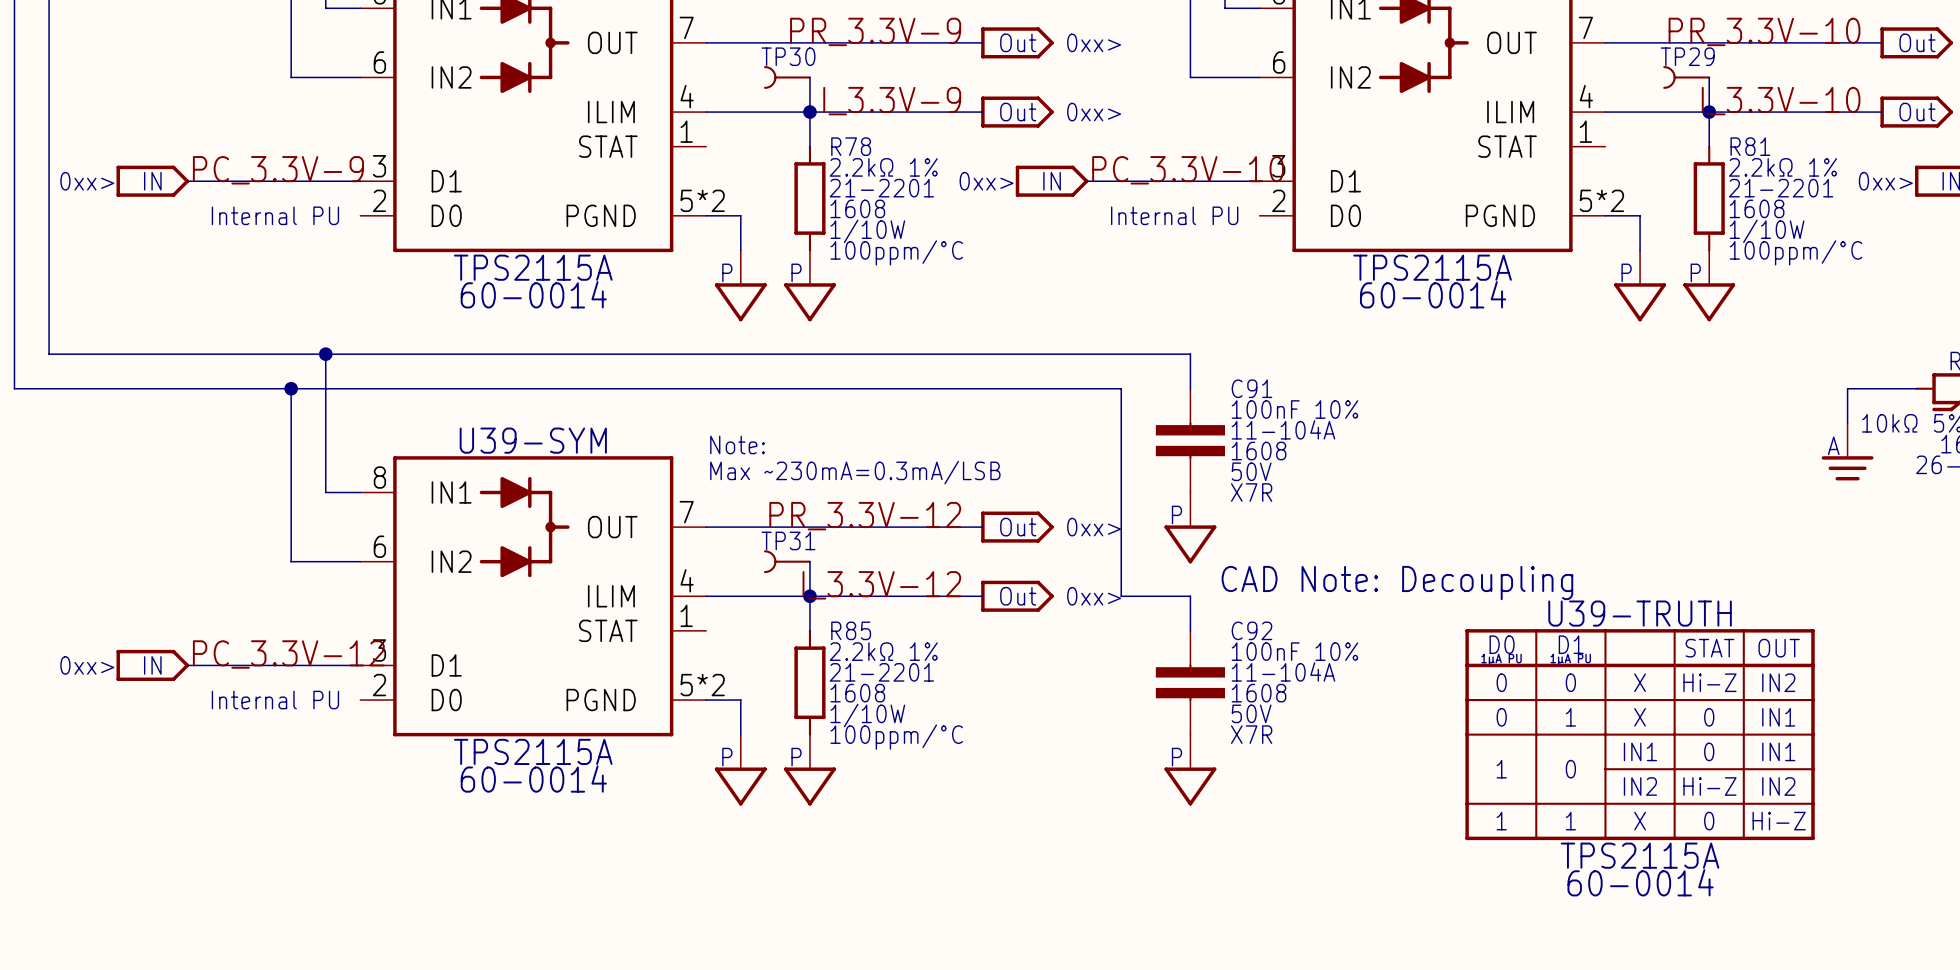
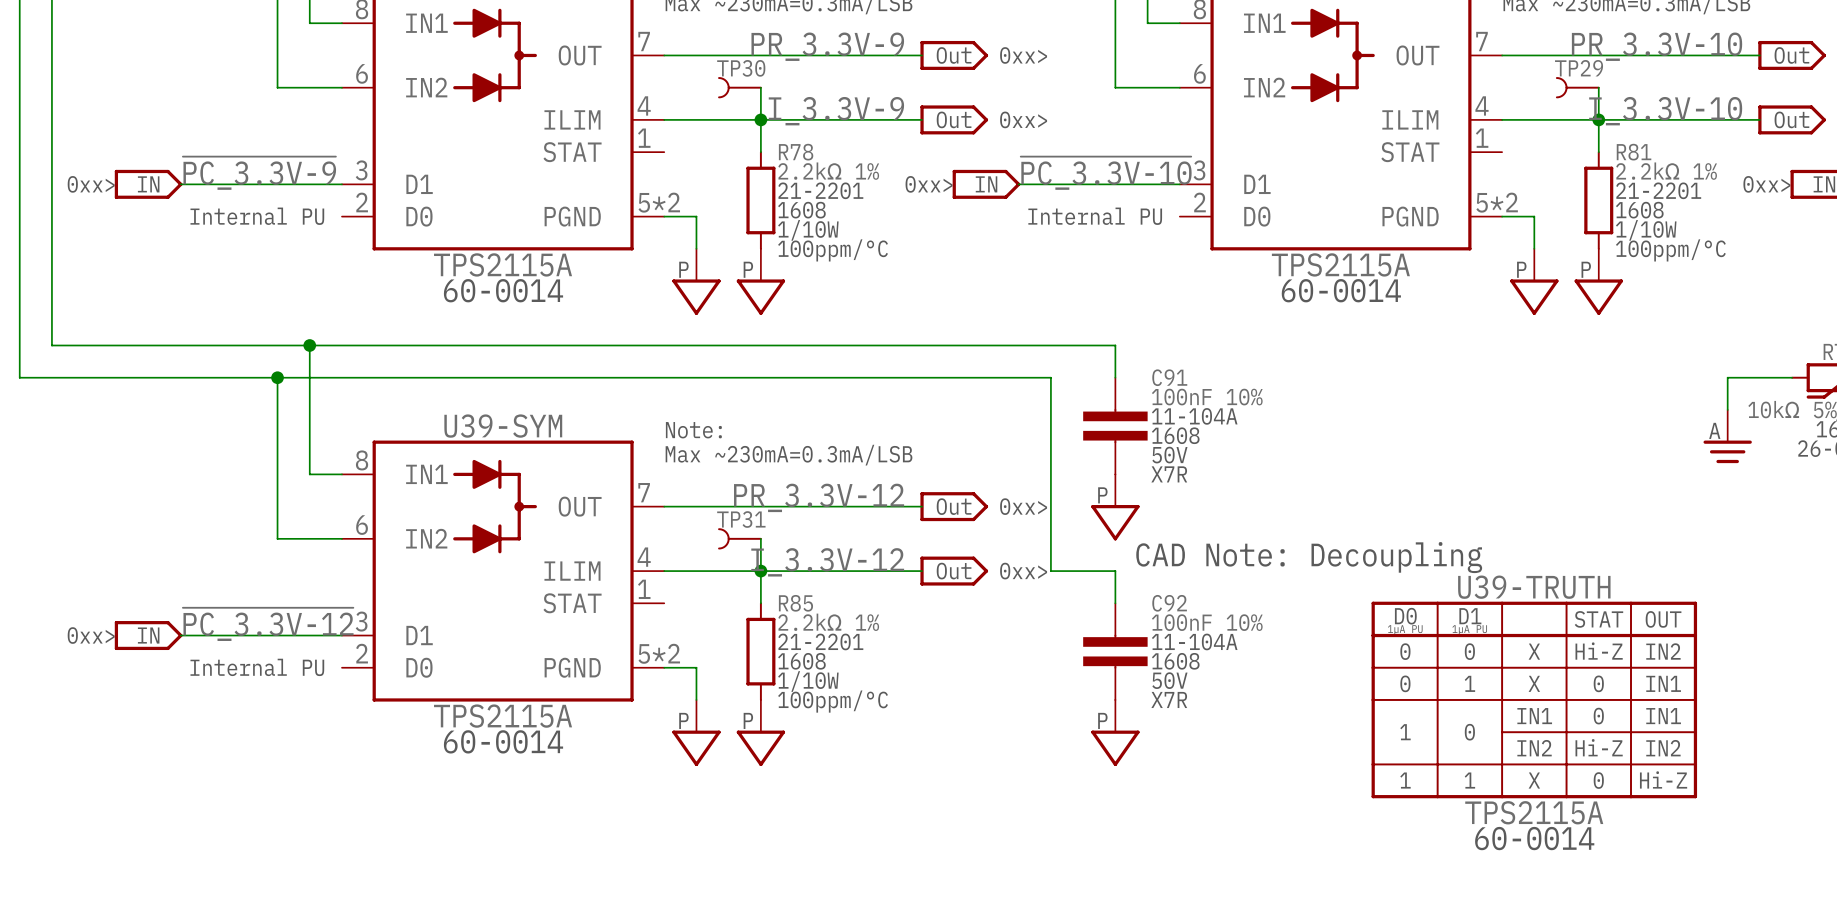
label: PC_3.3V-9 (278, 170) -> ~{PC_3.3V-9} (259, 173)
label: PC_3.3V-10 (1188, 170) -> ~{PC_3.3V-10} (1106, 173)
label: PC_3.3V-12 (288, 654) -> ~{PC_3.3V-12} (268, 624)

